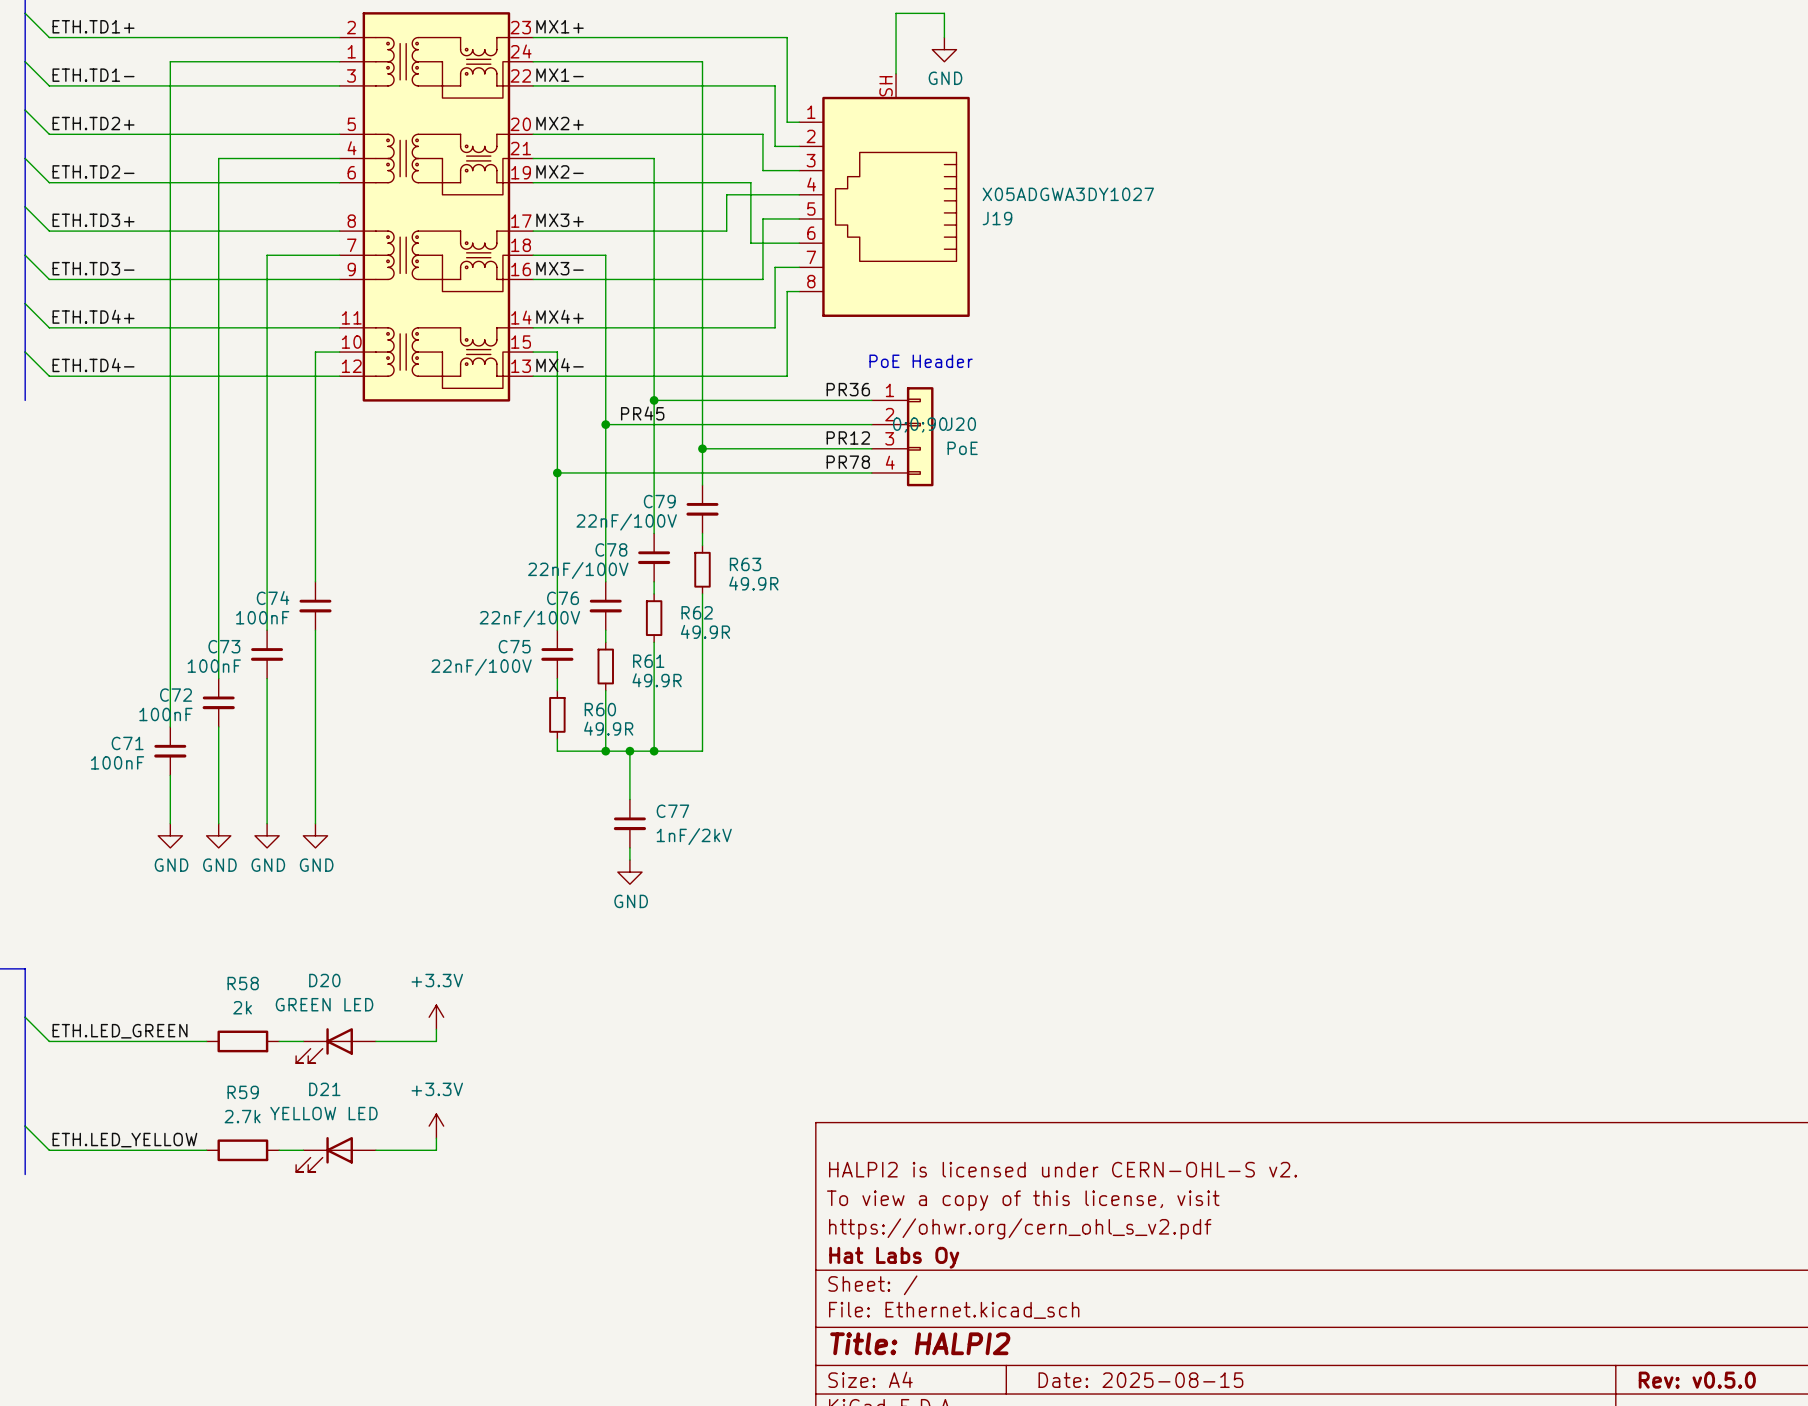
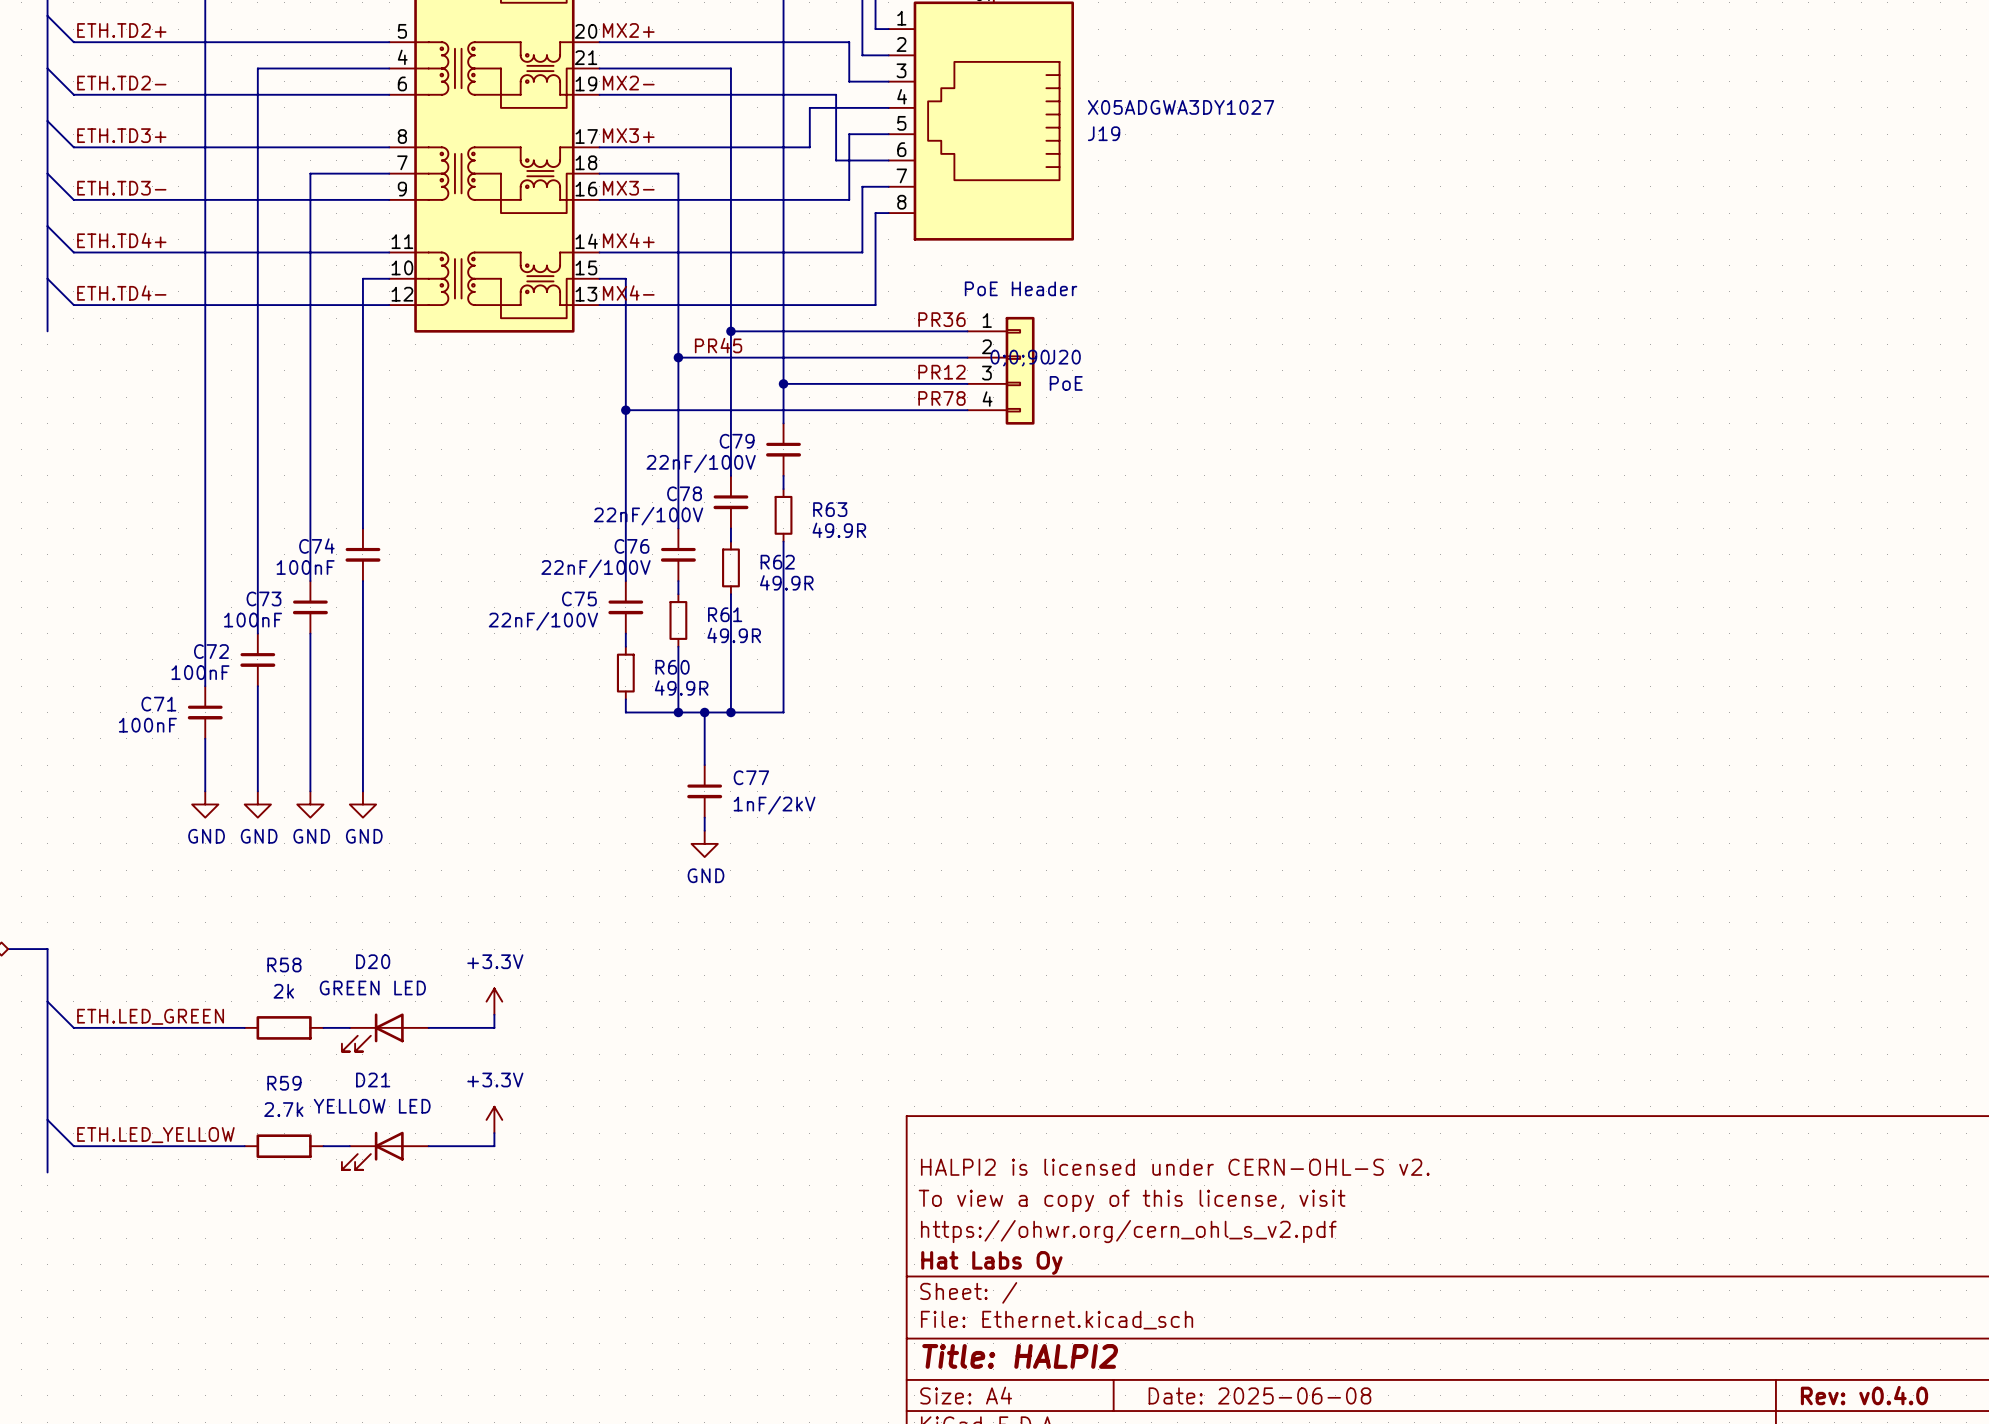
title block: Date: 2025-08-15 (1140, 1380) -> Date: 2025-06-08 (1259, 1395)
title block: Rev: v0.5.0 (1697, 1380) -> Rev: v0.4.0 (1864, 1395)

